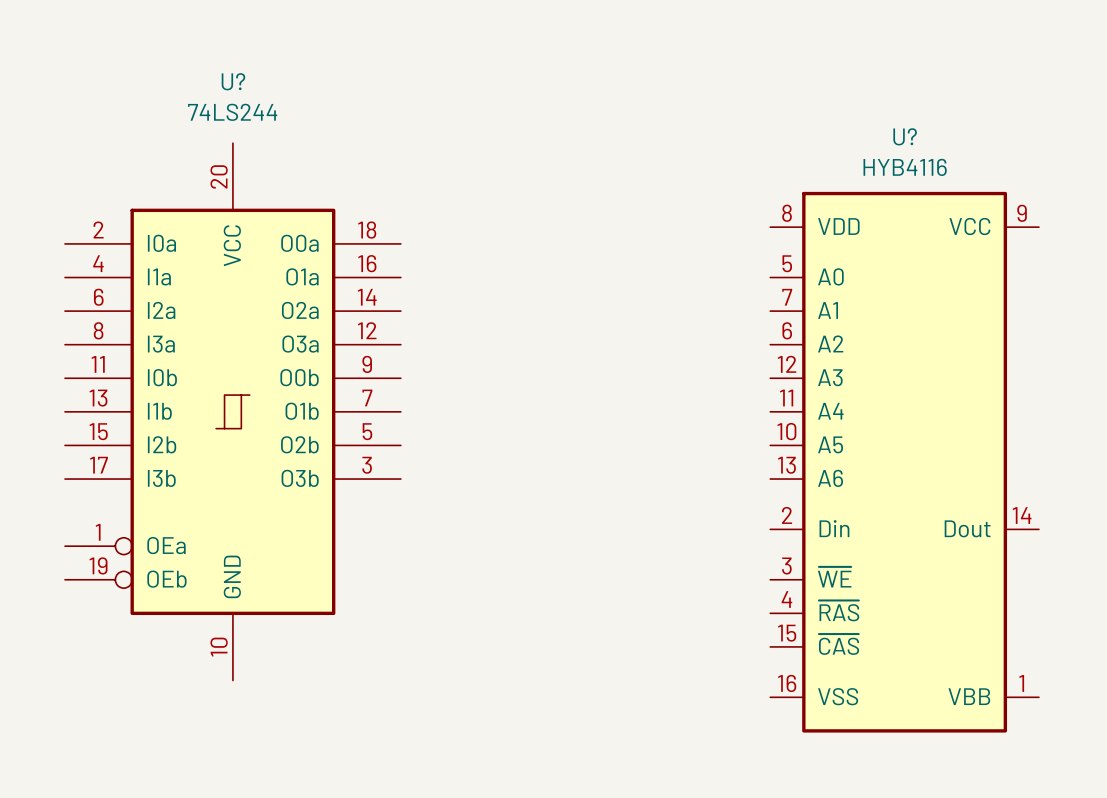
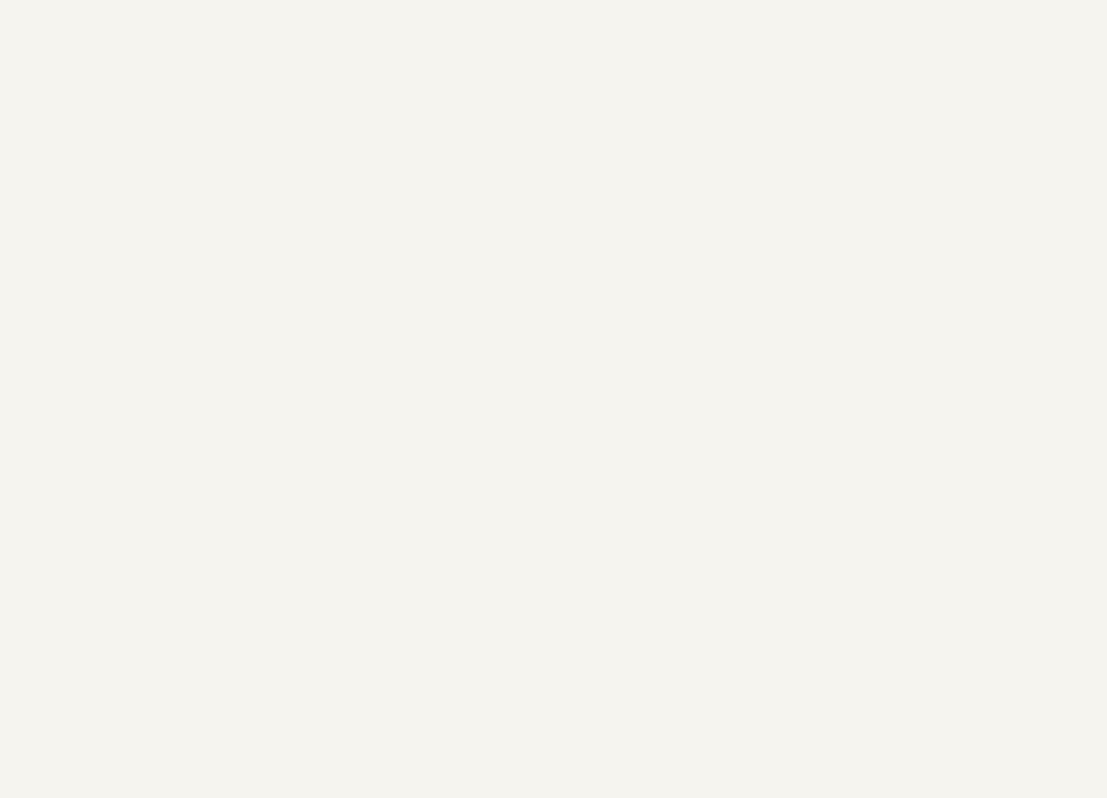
U?: 74LS244 (232, 411) -> none
U?: HYB4116 (904, 462) -> none

